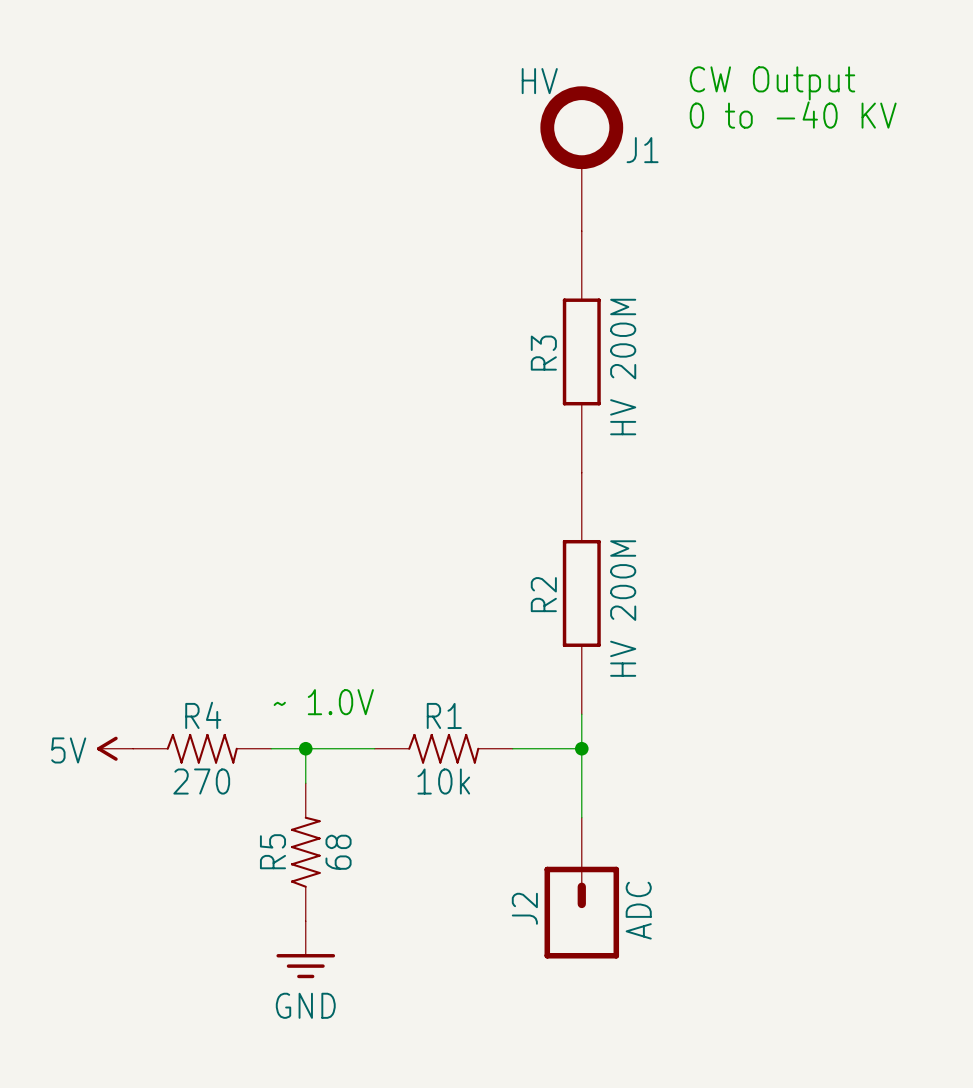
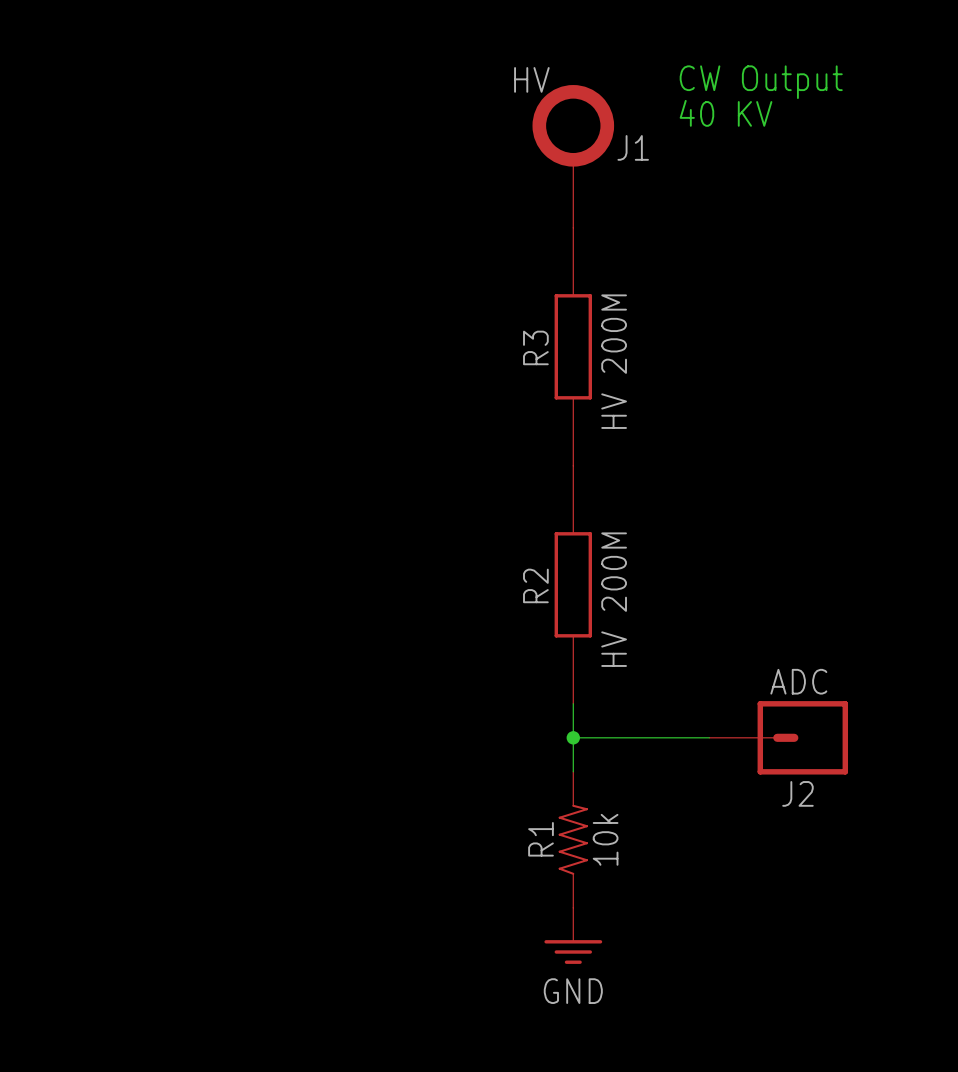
text: 0 to -40 KV (793, 115) -> 40 KV (726, 113)
text: ~ 1.0V (323, 702) -> none
power symbol: 5V (115, 748) -> none
R4: 270 (202, 748) -> none
wire: (271, 748) (374, 748) -> none
wire: (305, 748) (305, 783) -> none
junction: (305, 748) -> none
R1 rotation: 0° (443, 748) -> 90° counterclockwise (573, 839)
R1 position: (443, 748) -> (573, 839)
wire: (512, 748) (581, 748) -> (709, 737) (573, 737)
R5: 68 (305, 852) -> none
J2 position: (581, 888) -> (778, 737)
J2 rotation: 0° (581, 912) -> 90° counterclockwise (802, 737)
power symbol position: GND (305, 949) -> GND (573, 935)

